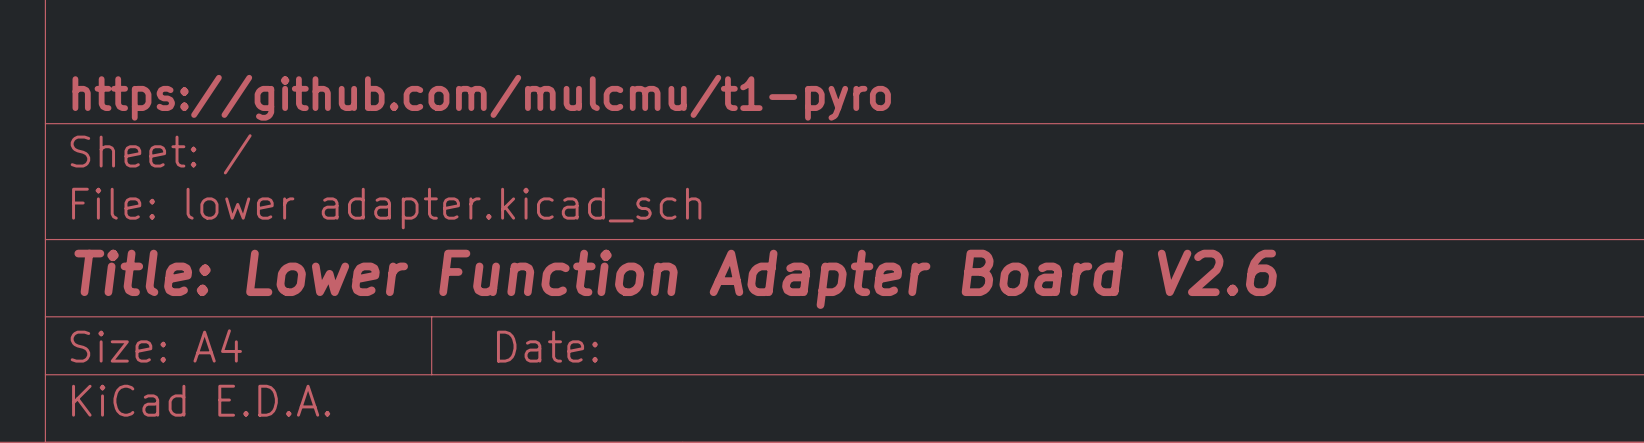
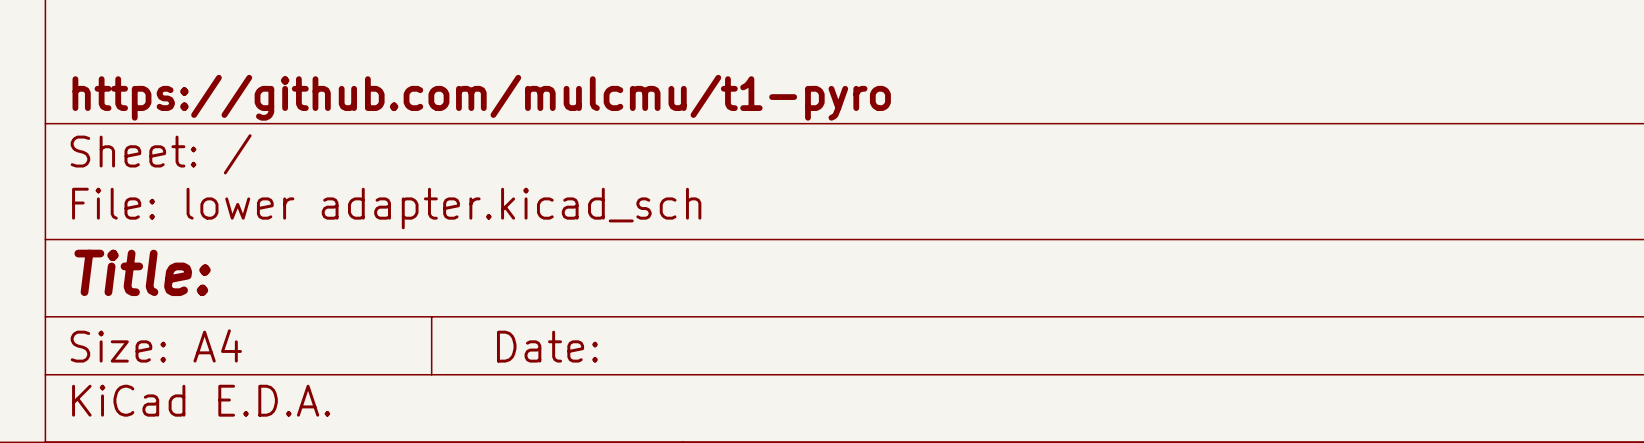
title block: Title: Lower Function Adapter Board V2.6 (675, 279) -> Title: (142, 272)

